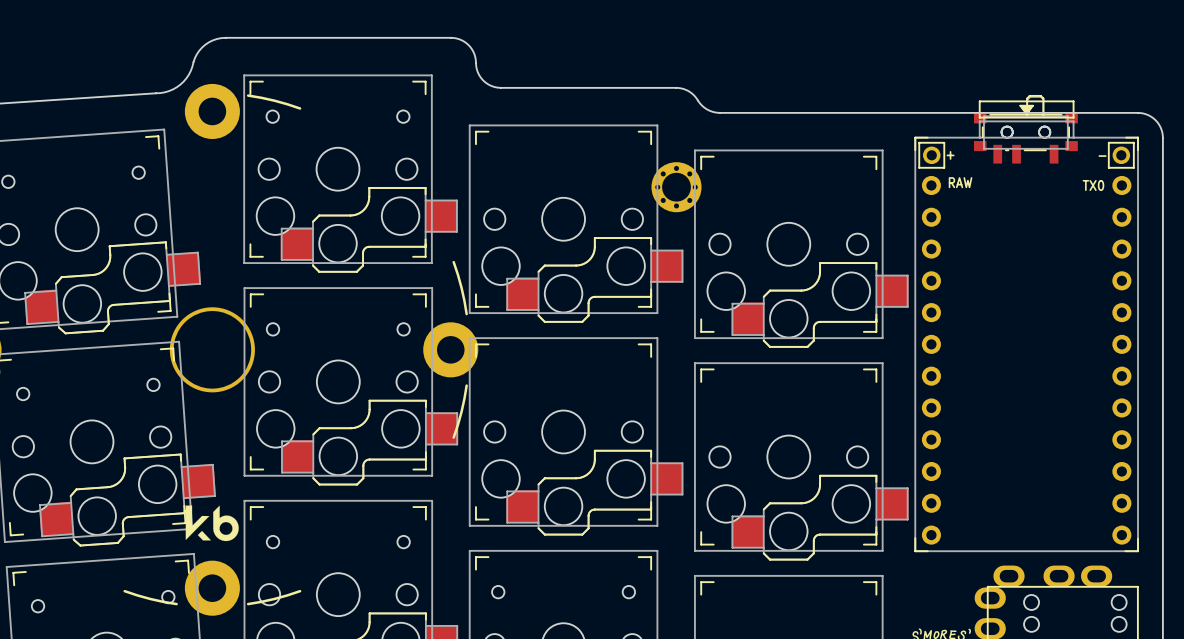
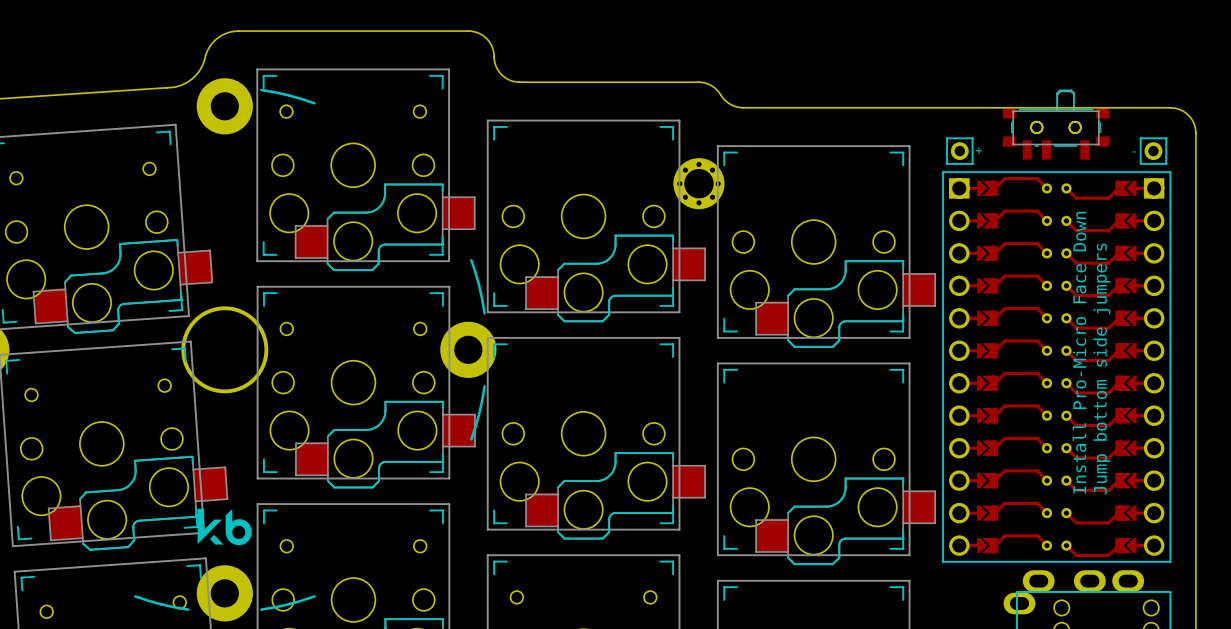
part: (1026, 326) -> none
text: none -> Install Pro-Micro Face Down (1079, 352)
text: none -> Jump bottom side jumpers (1101, 368)
part: none -> (1056, 367)

